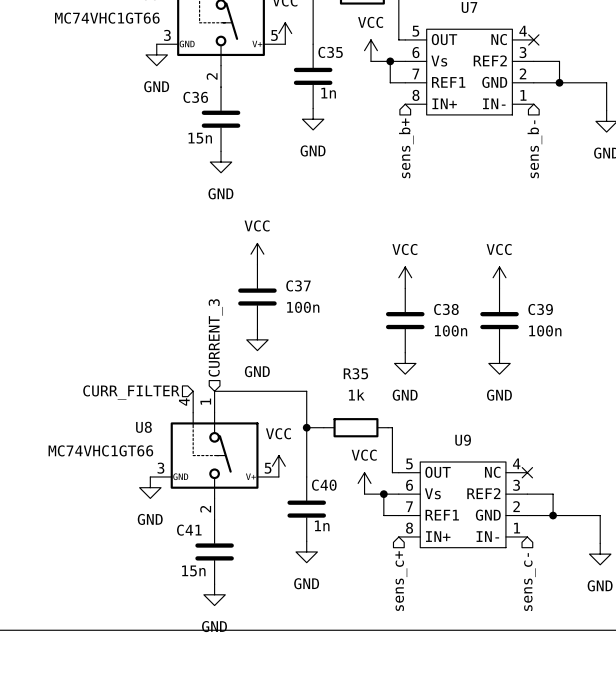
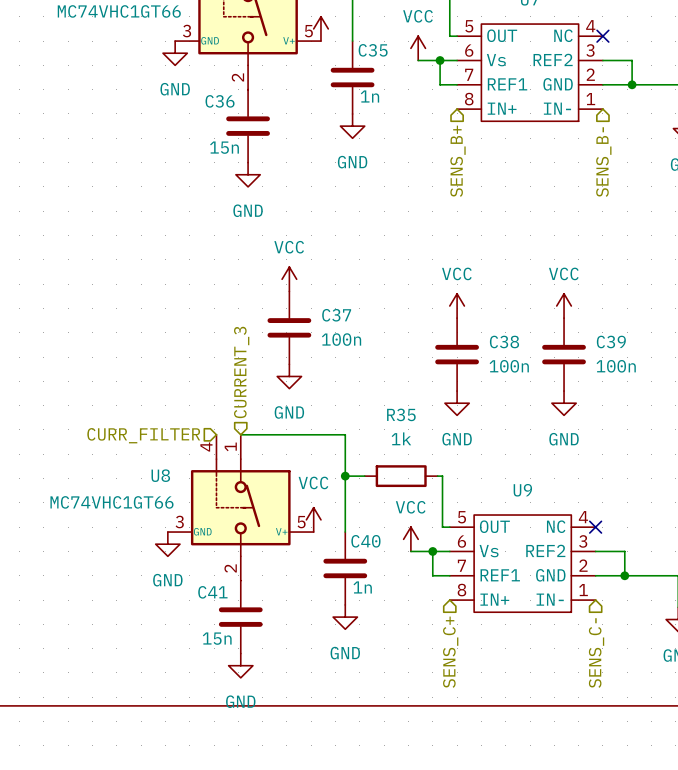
hierarchical label: sens_b+ (406, 148) -> SENS_B+ (458, 161)
hierarchical label: sens_b- (534, 149) -> SENS_B- (603, 162)
hierarchical label: sens_c+ (401, 581) -> SENS_C+ (450, 652)
hierarchical label: sens_c- (529, 582) -> SENS_C- (596, 653)

